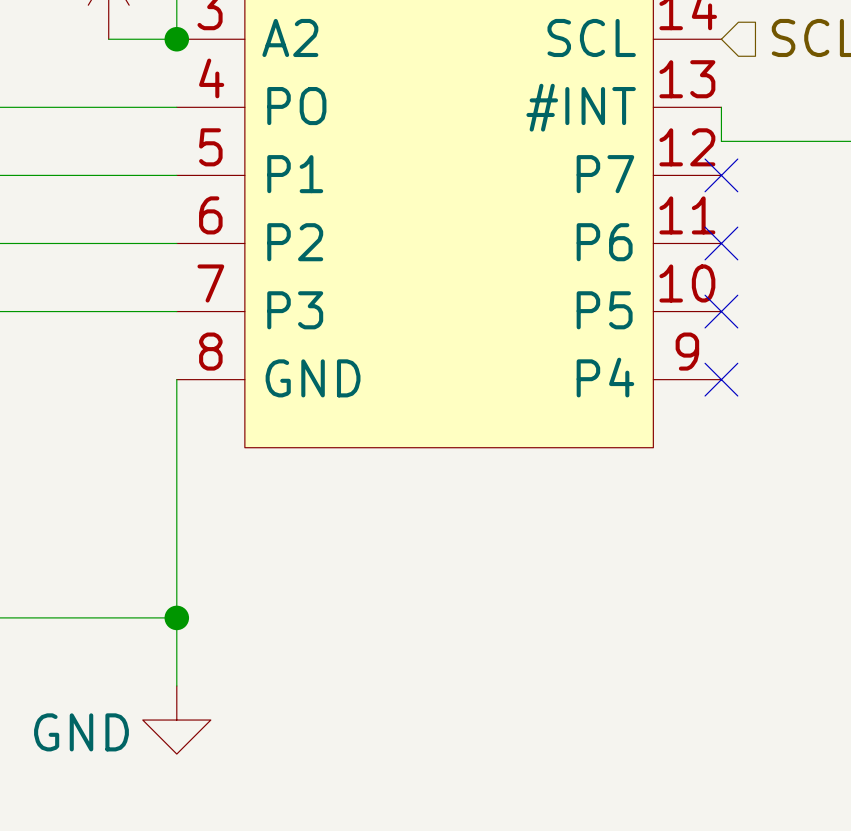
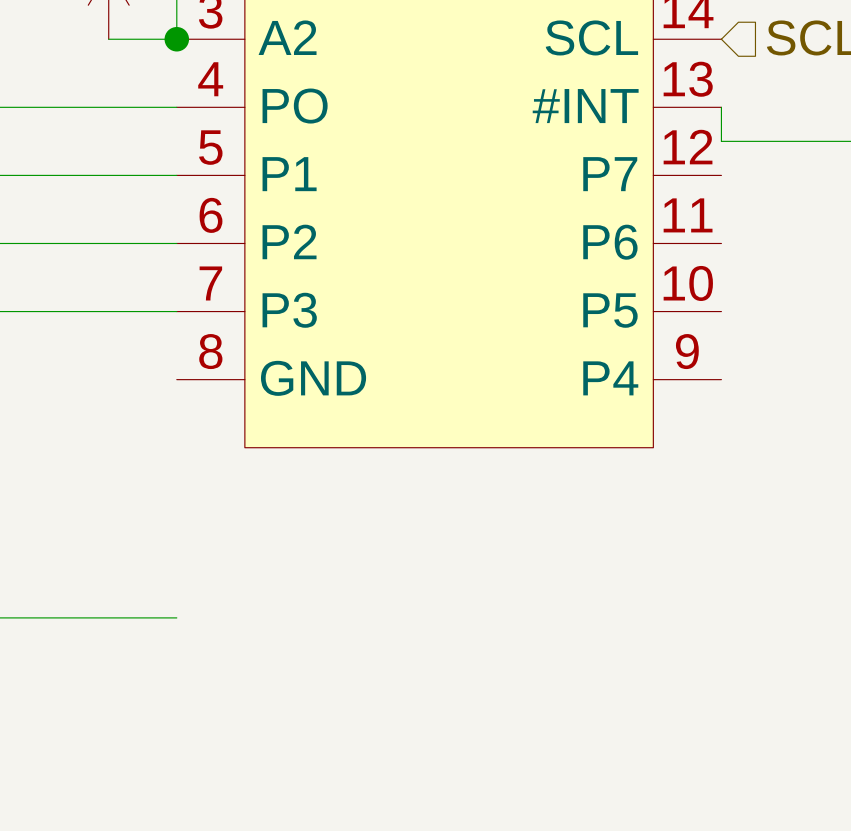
no-connect mark: (721, 175) -> none
no-connect mark: (721, 243) -> none
no-connect mark: (721, 311) -> none
wire: (176, 379) (176, 685) -> none
no-connect mark: (721, 379) -> none
junction: (176, 617) -> none
power symbol: GND (176, 720) -> none

